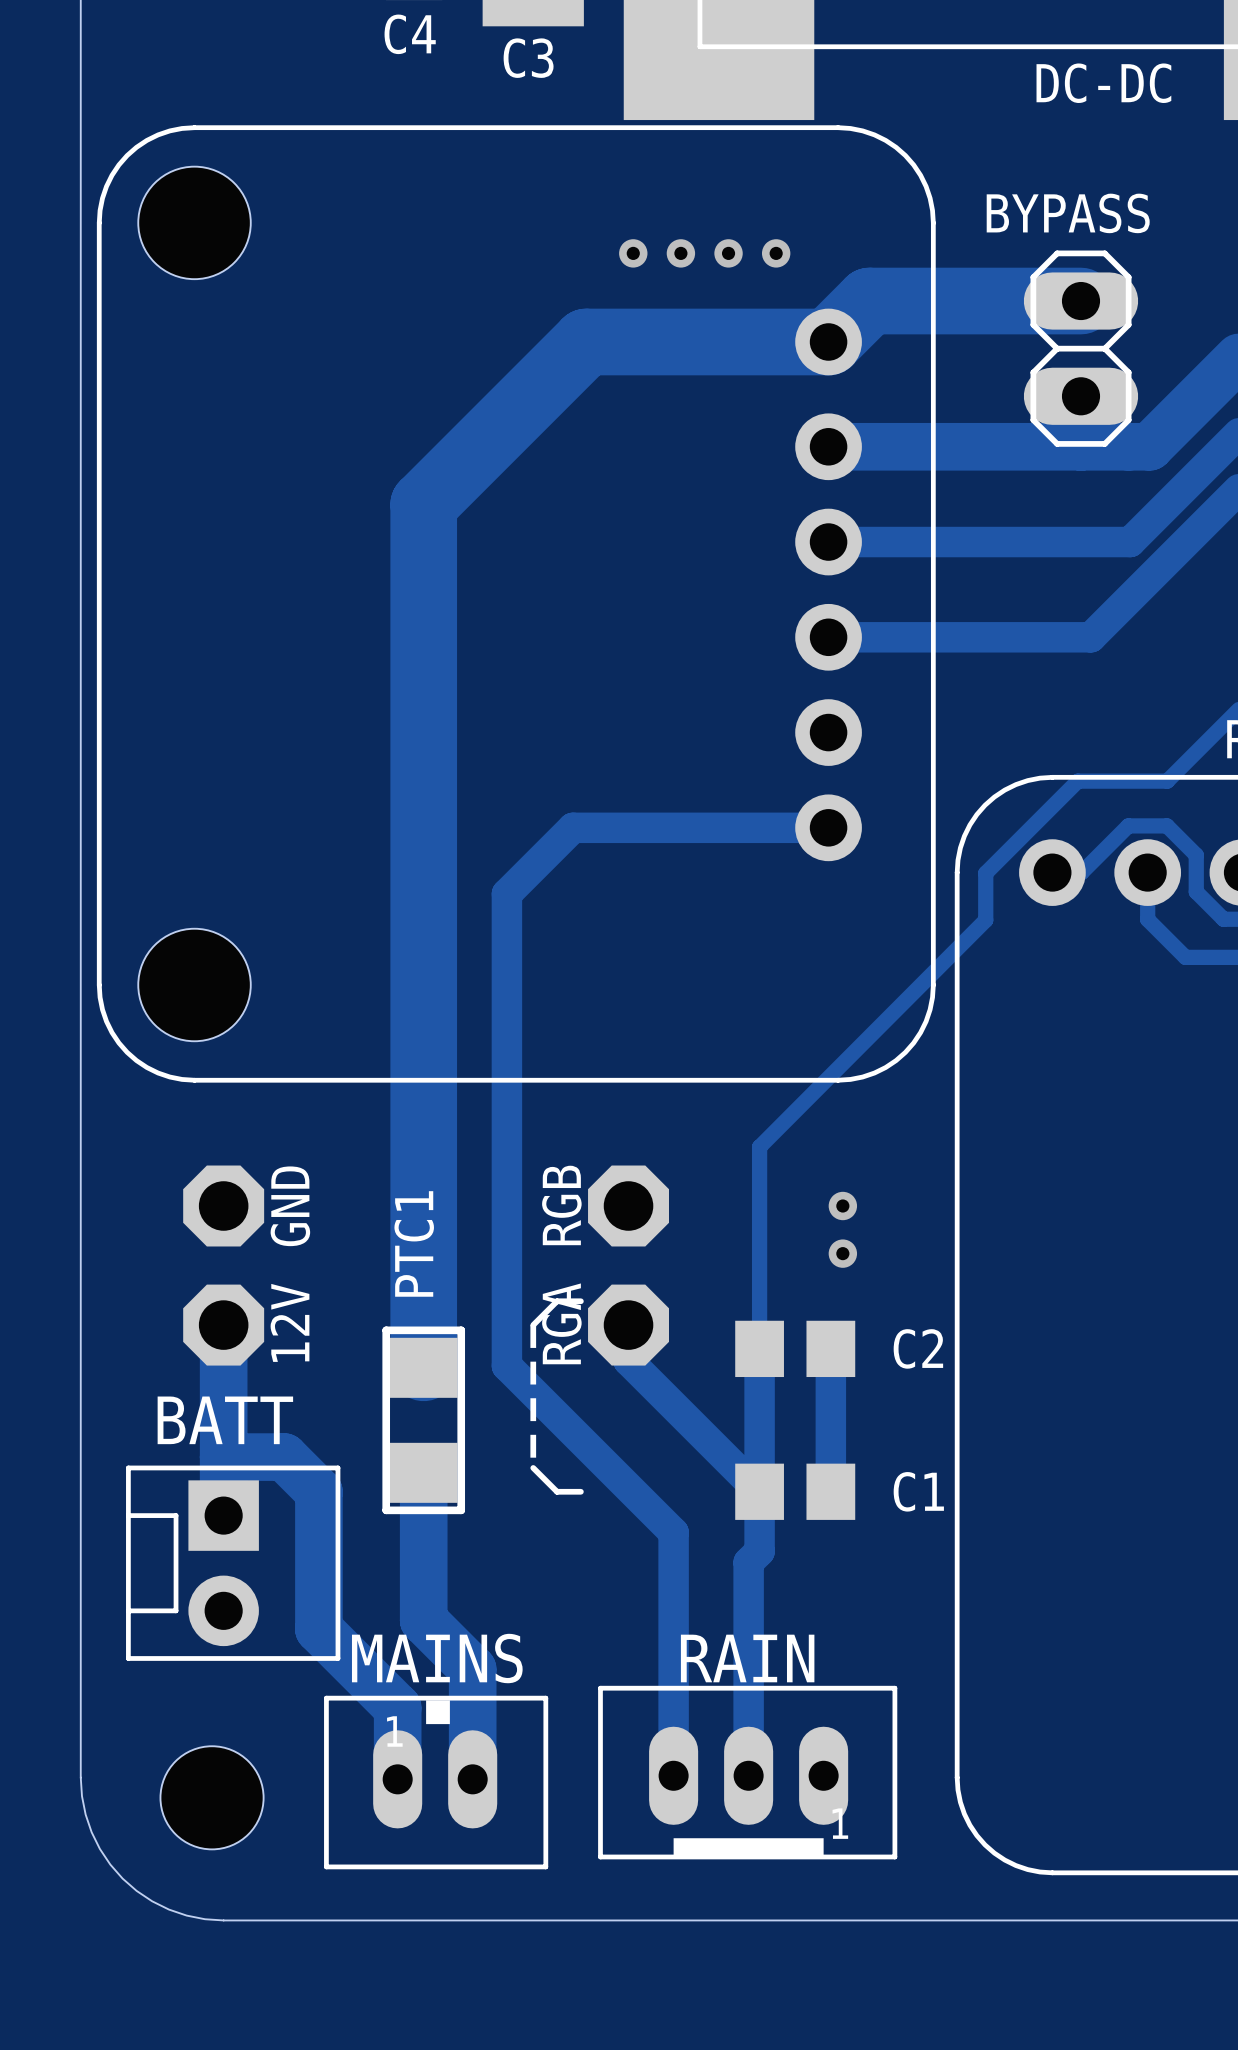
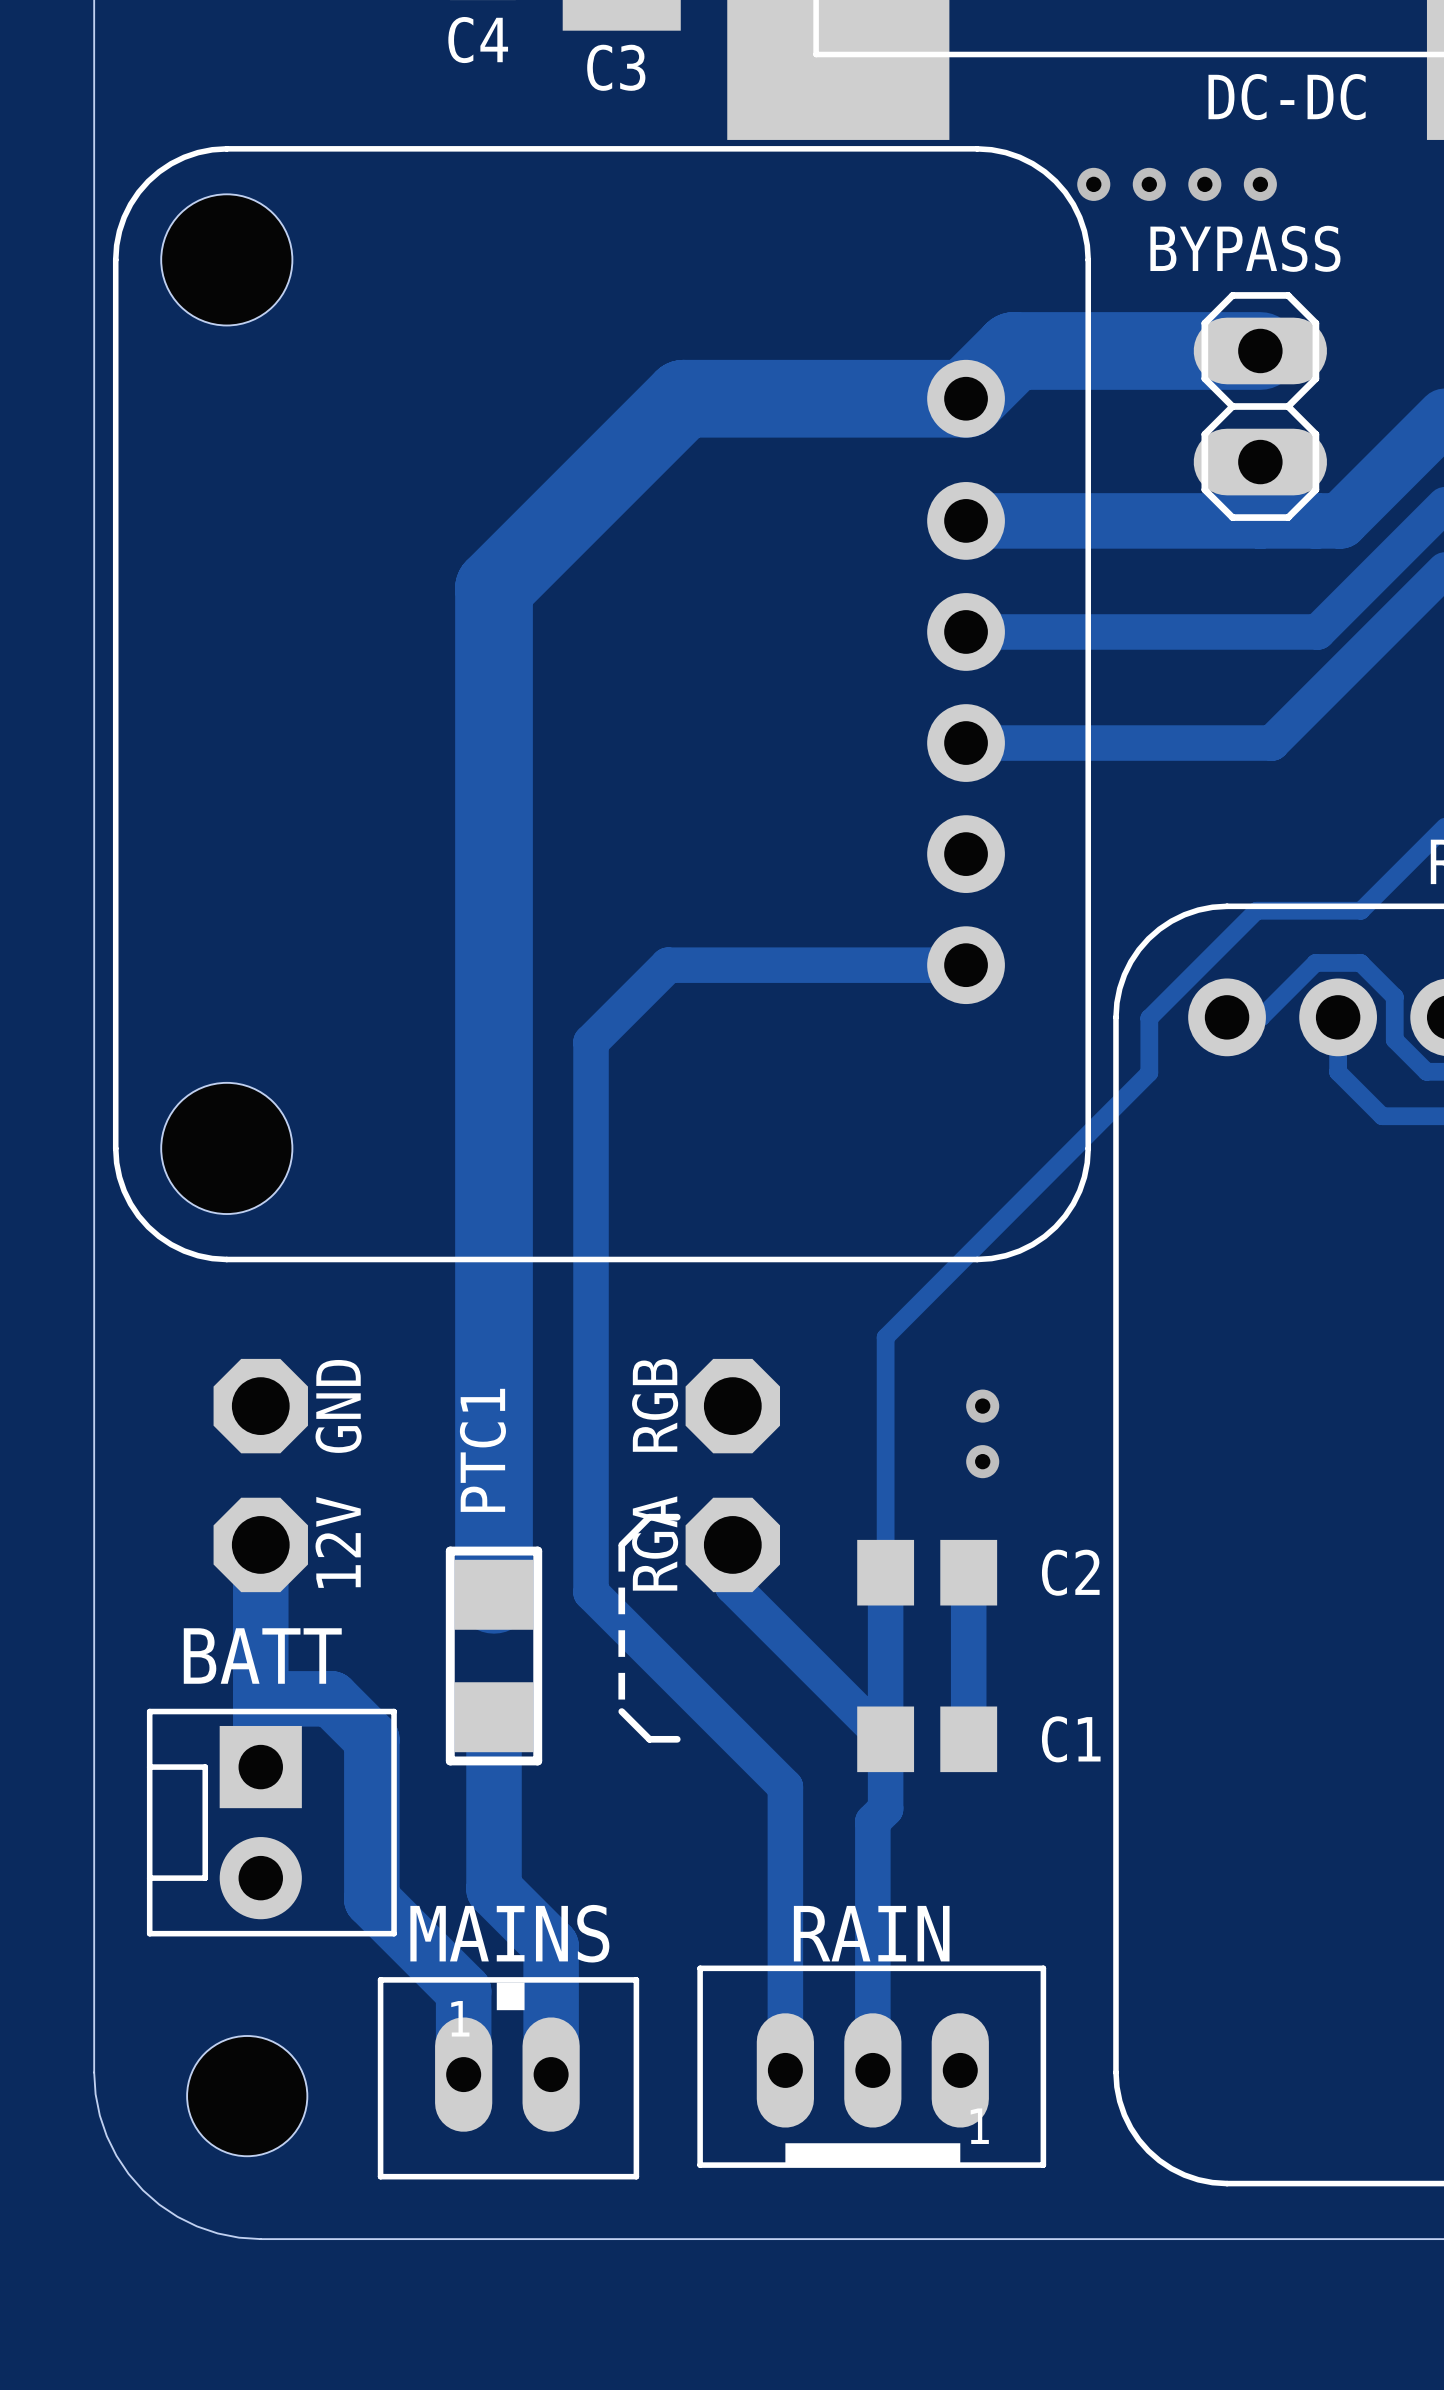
via: none -> (1093, 184)
via: none -> (1149, 184)
via: none -> (1204, 184)
via: none -> (1260, 184)
via: (633, 253) -> none
via: (680, 253) -> none
via: (728, 253) -> none
via: (776, 253) -> none

